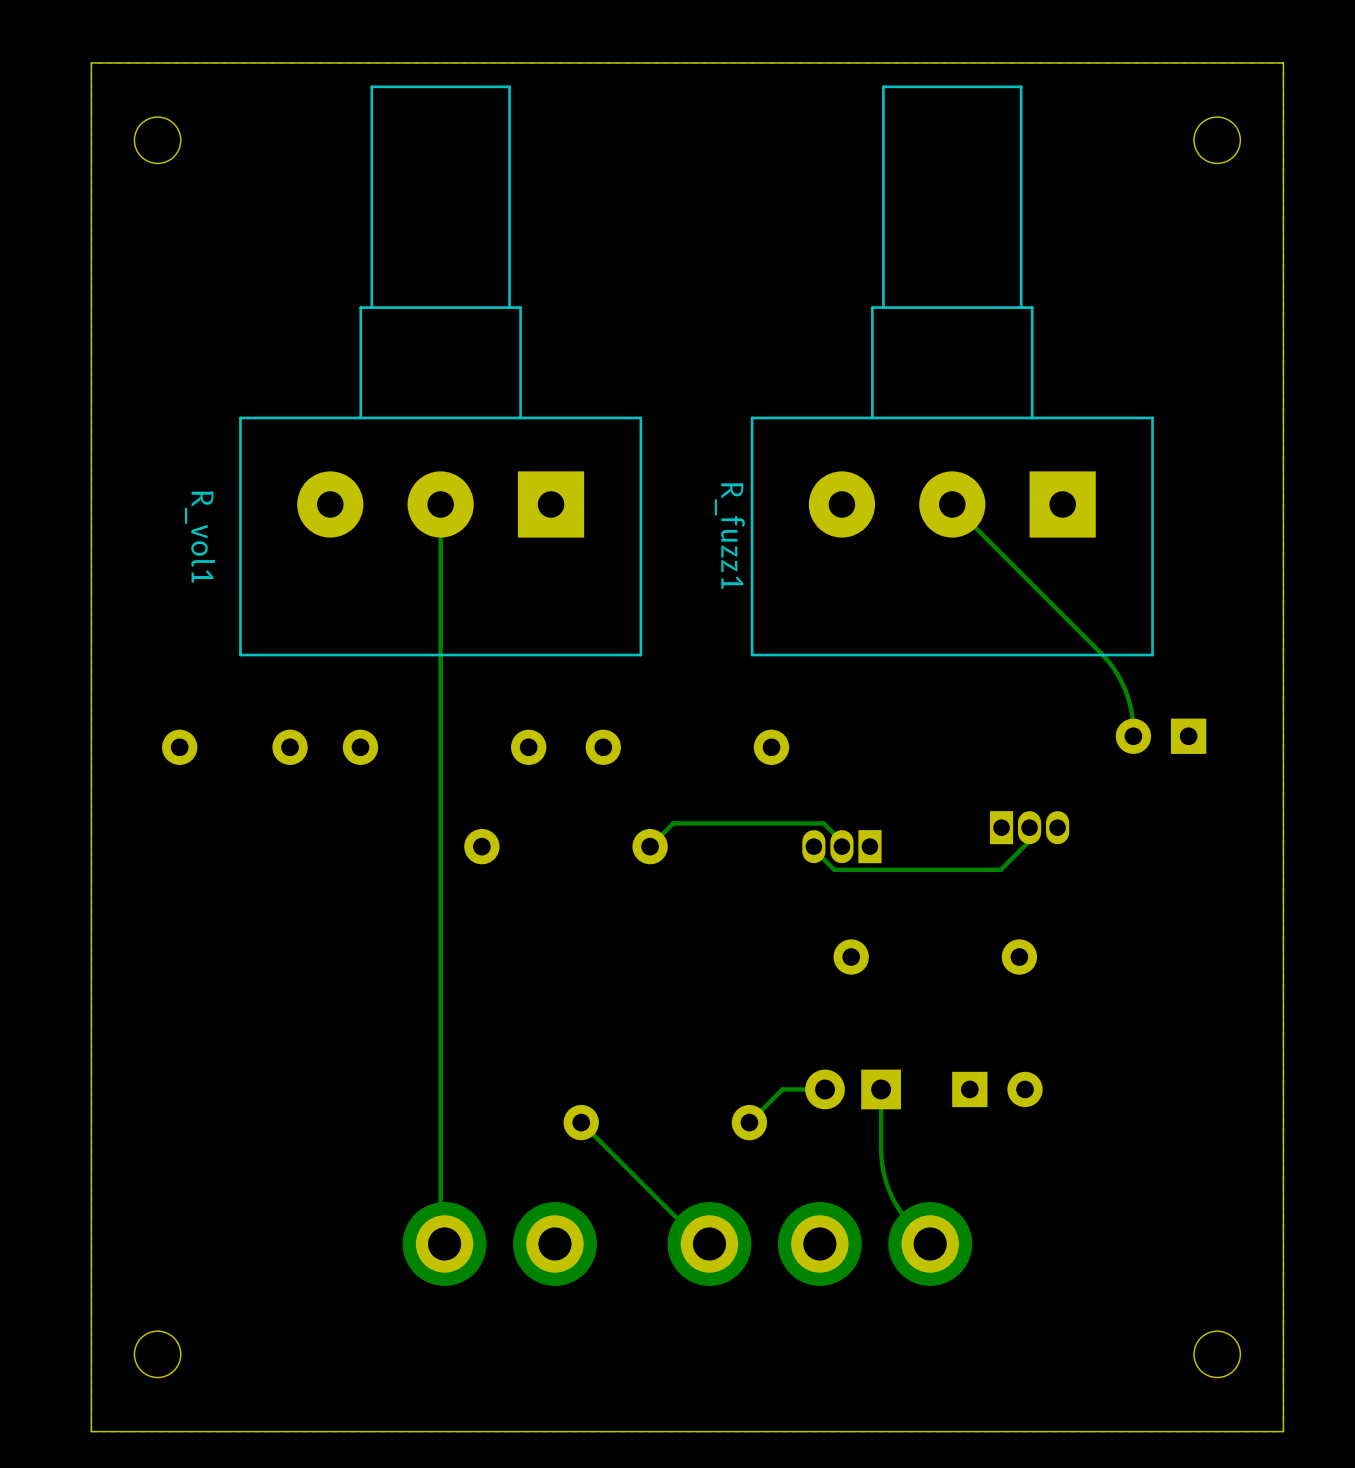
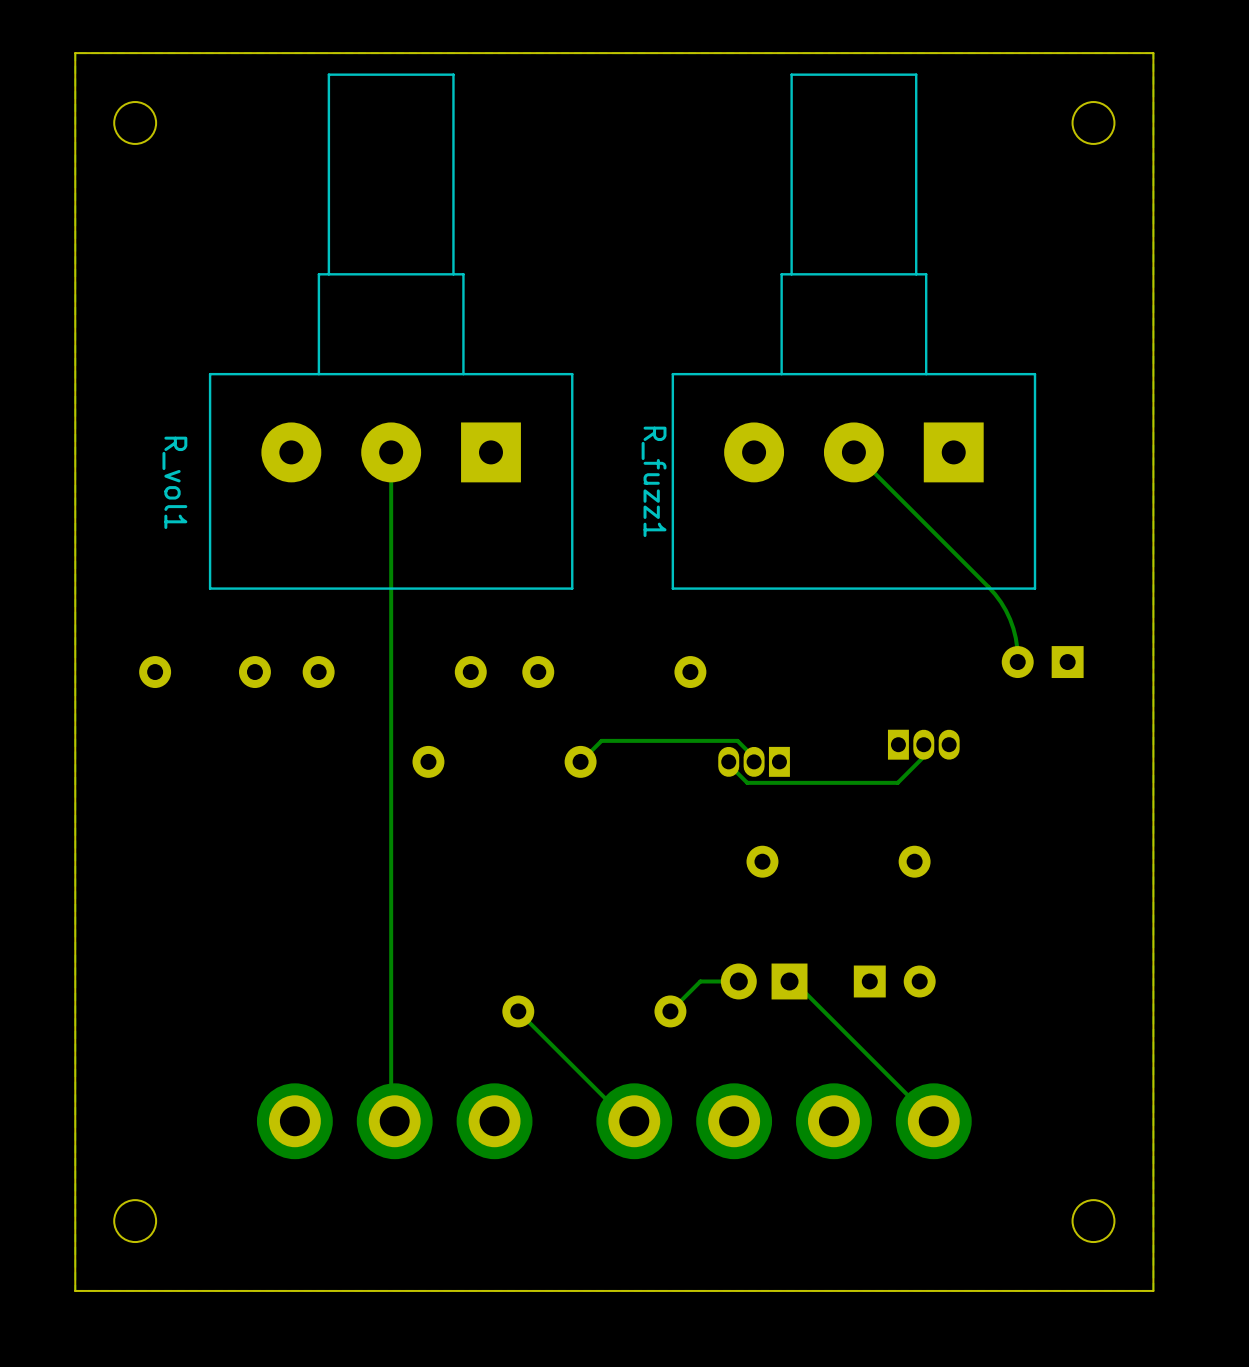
track: (881, 1089) (881, 1159) (885, 1181) (899, 1210) (930, 1243) -> (789, 981) (794, 981) (933, 1121)
part: none -> (294, 1121)
part: none -> (933, 1121)

